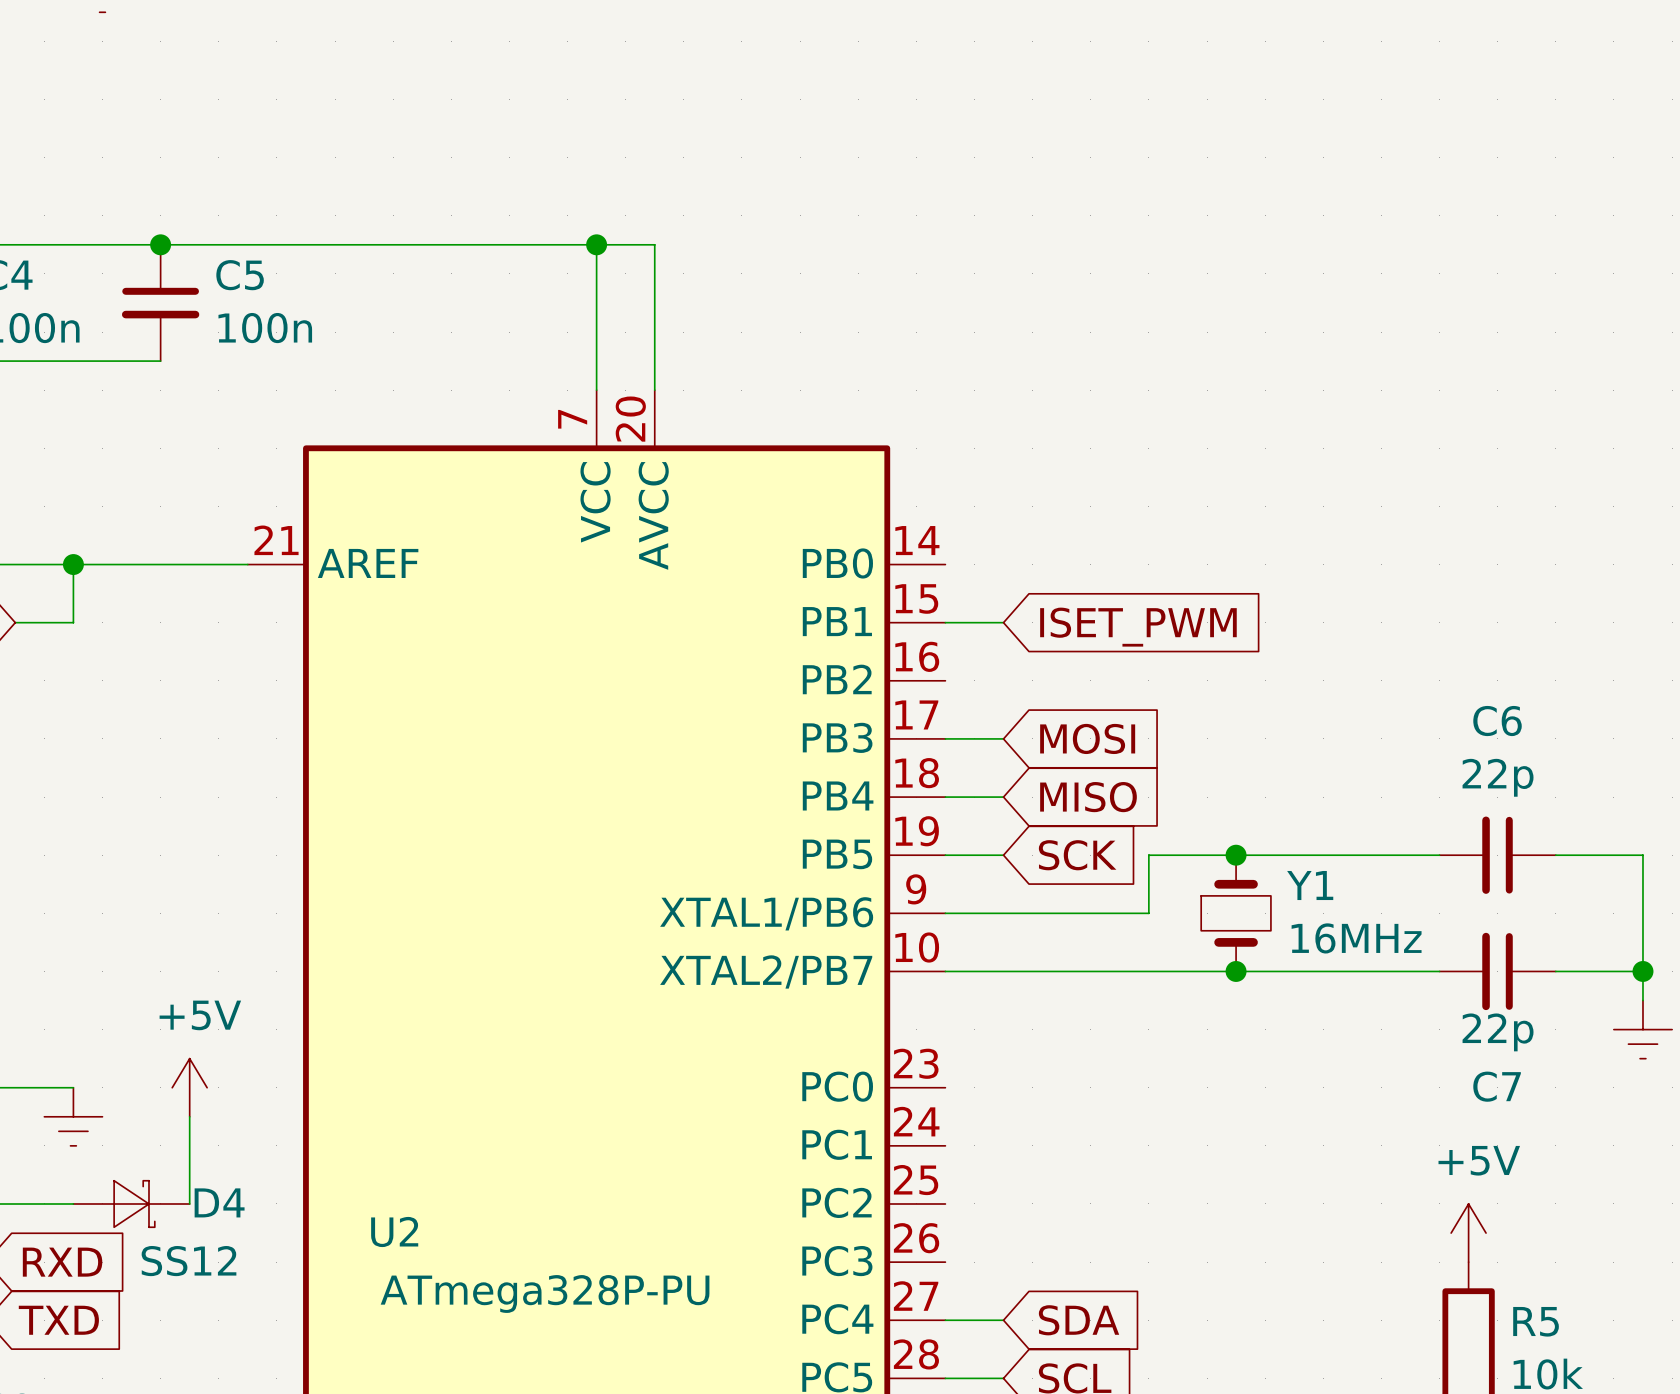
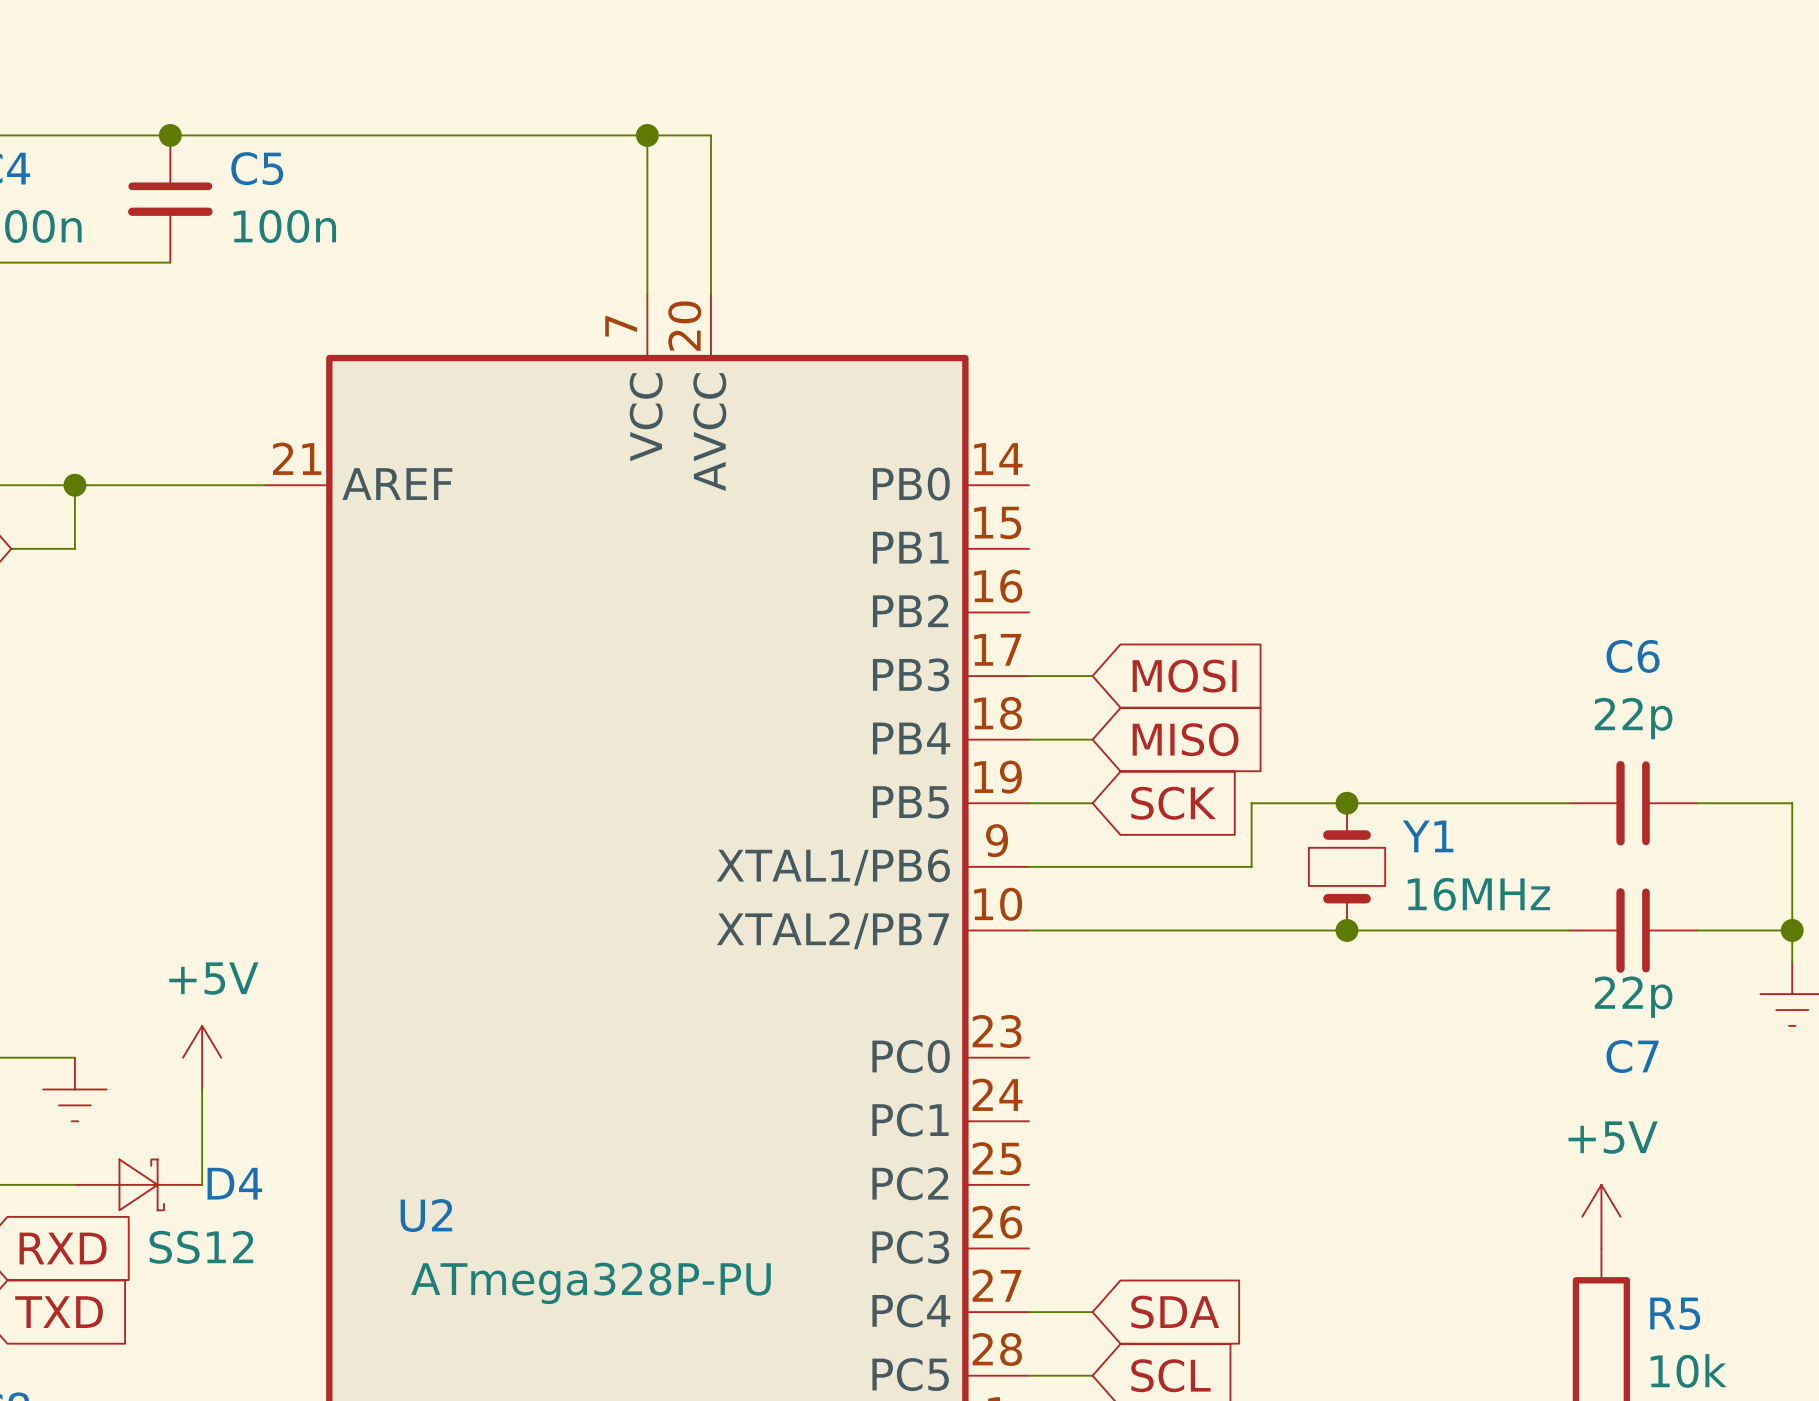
wire: (945, 622) (1003, 622) -> none
global label: ISET_PWM (1138, 627) -> none

